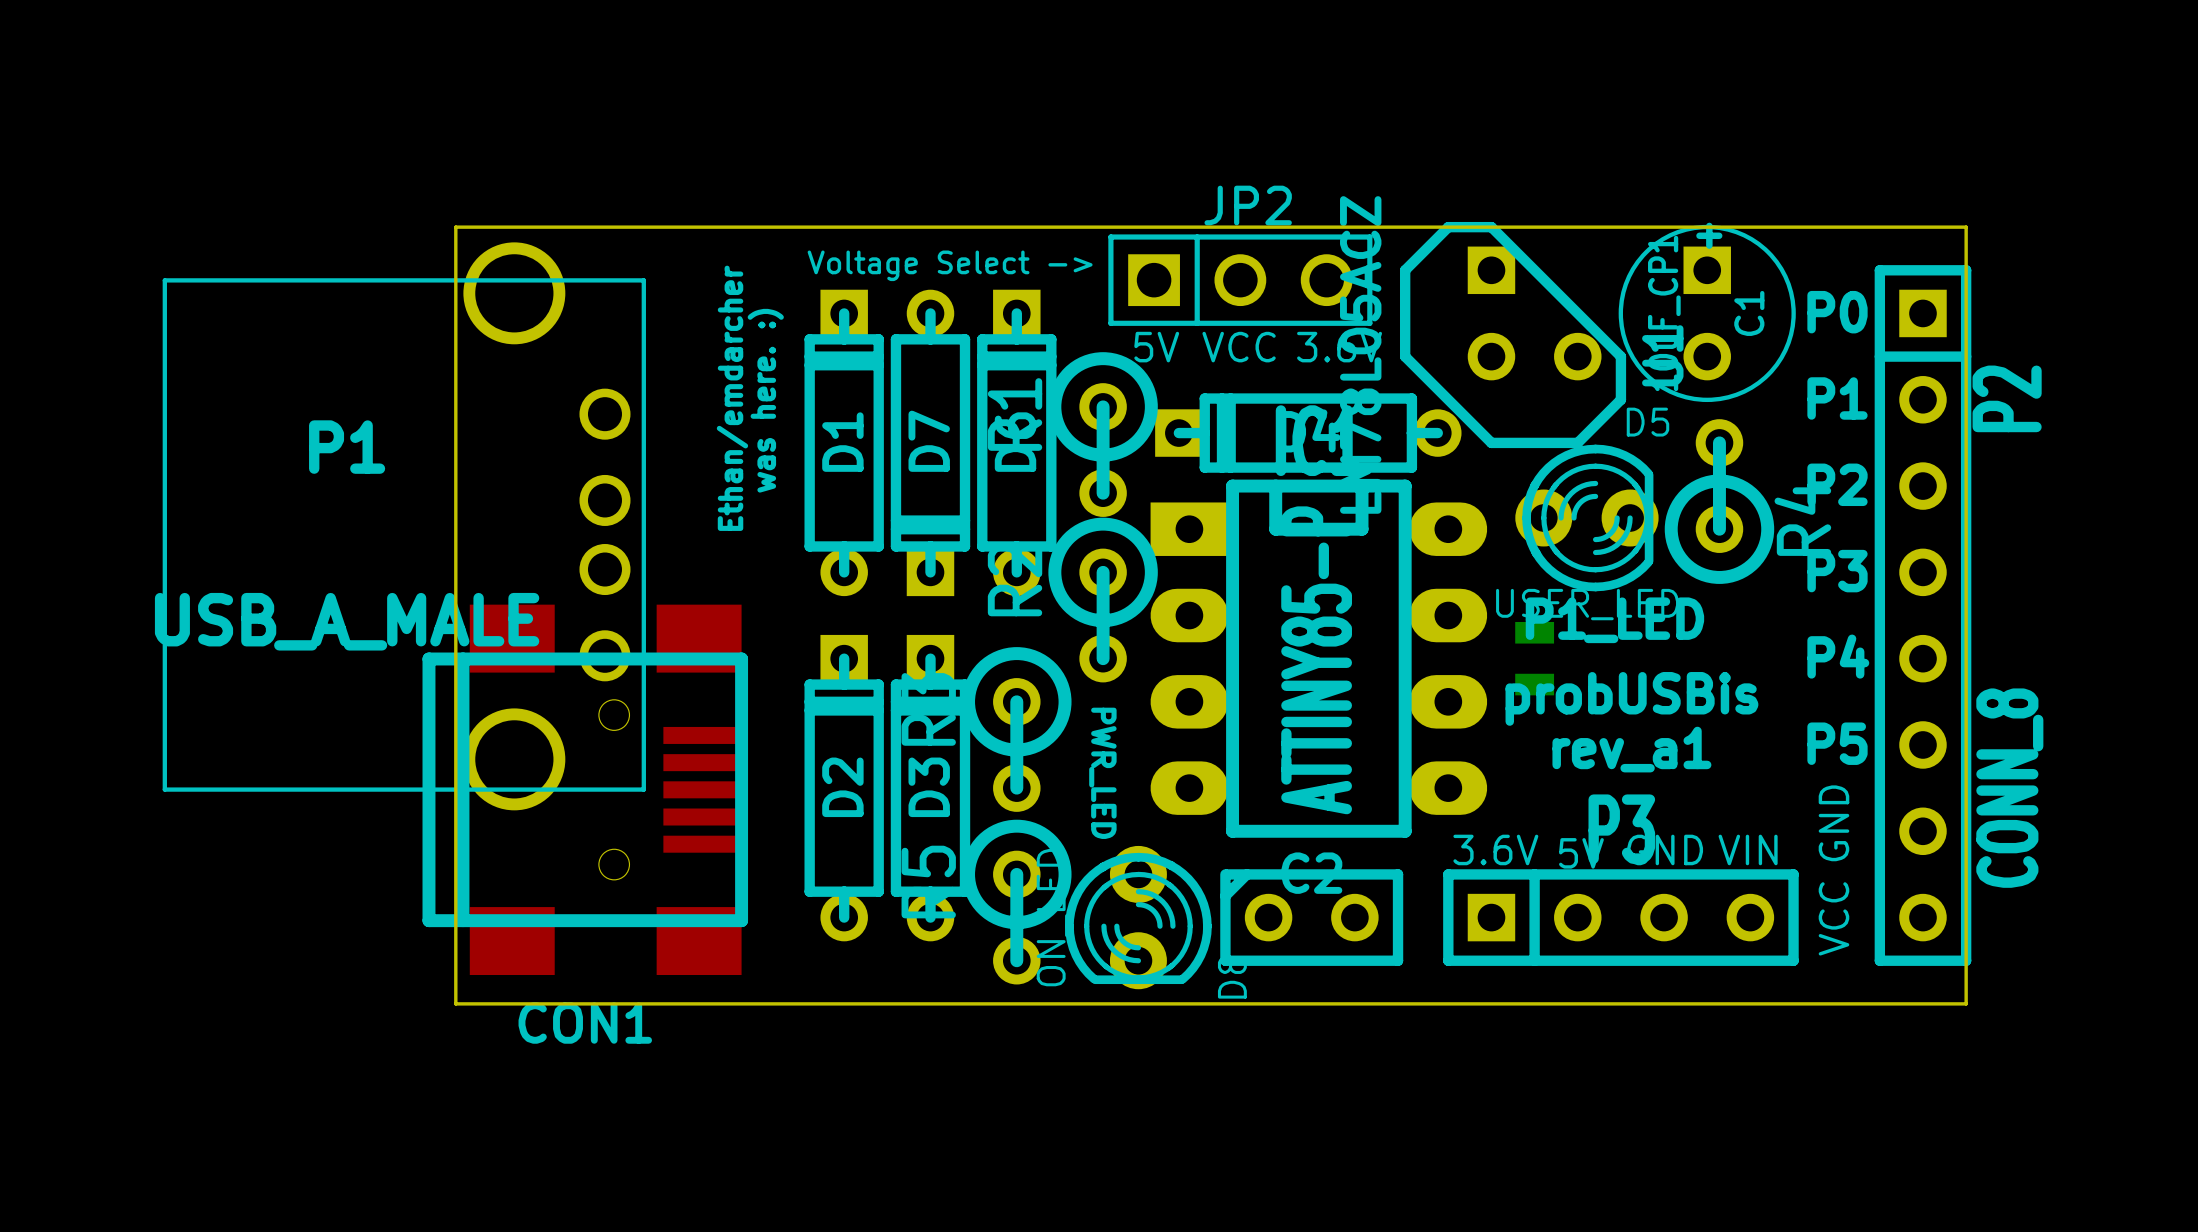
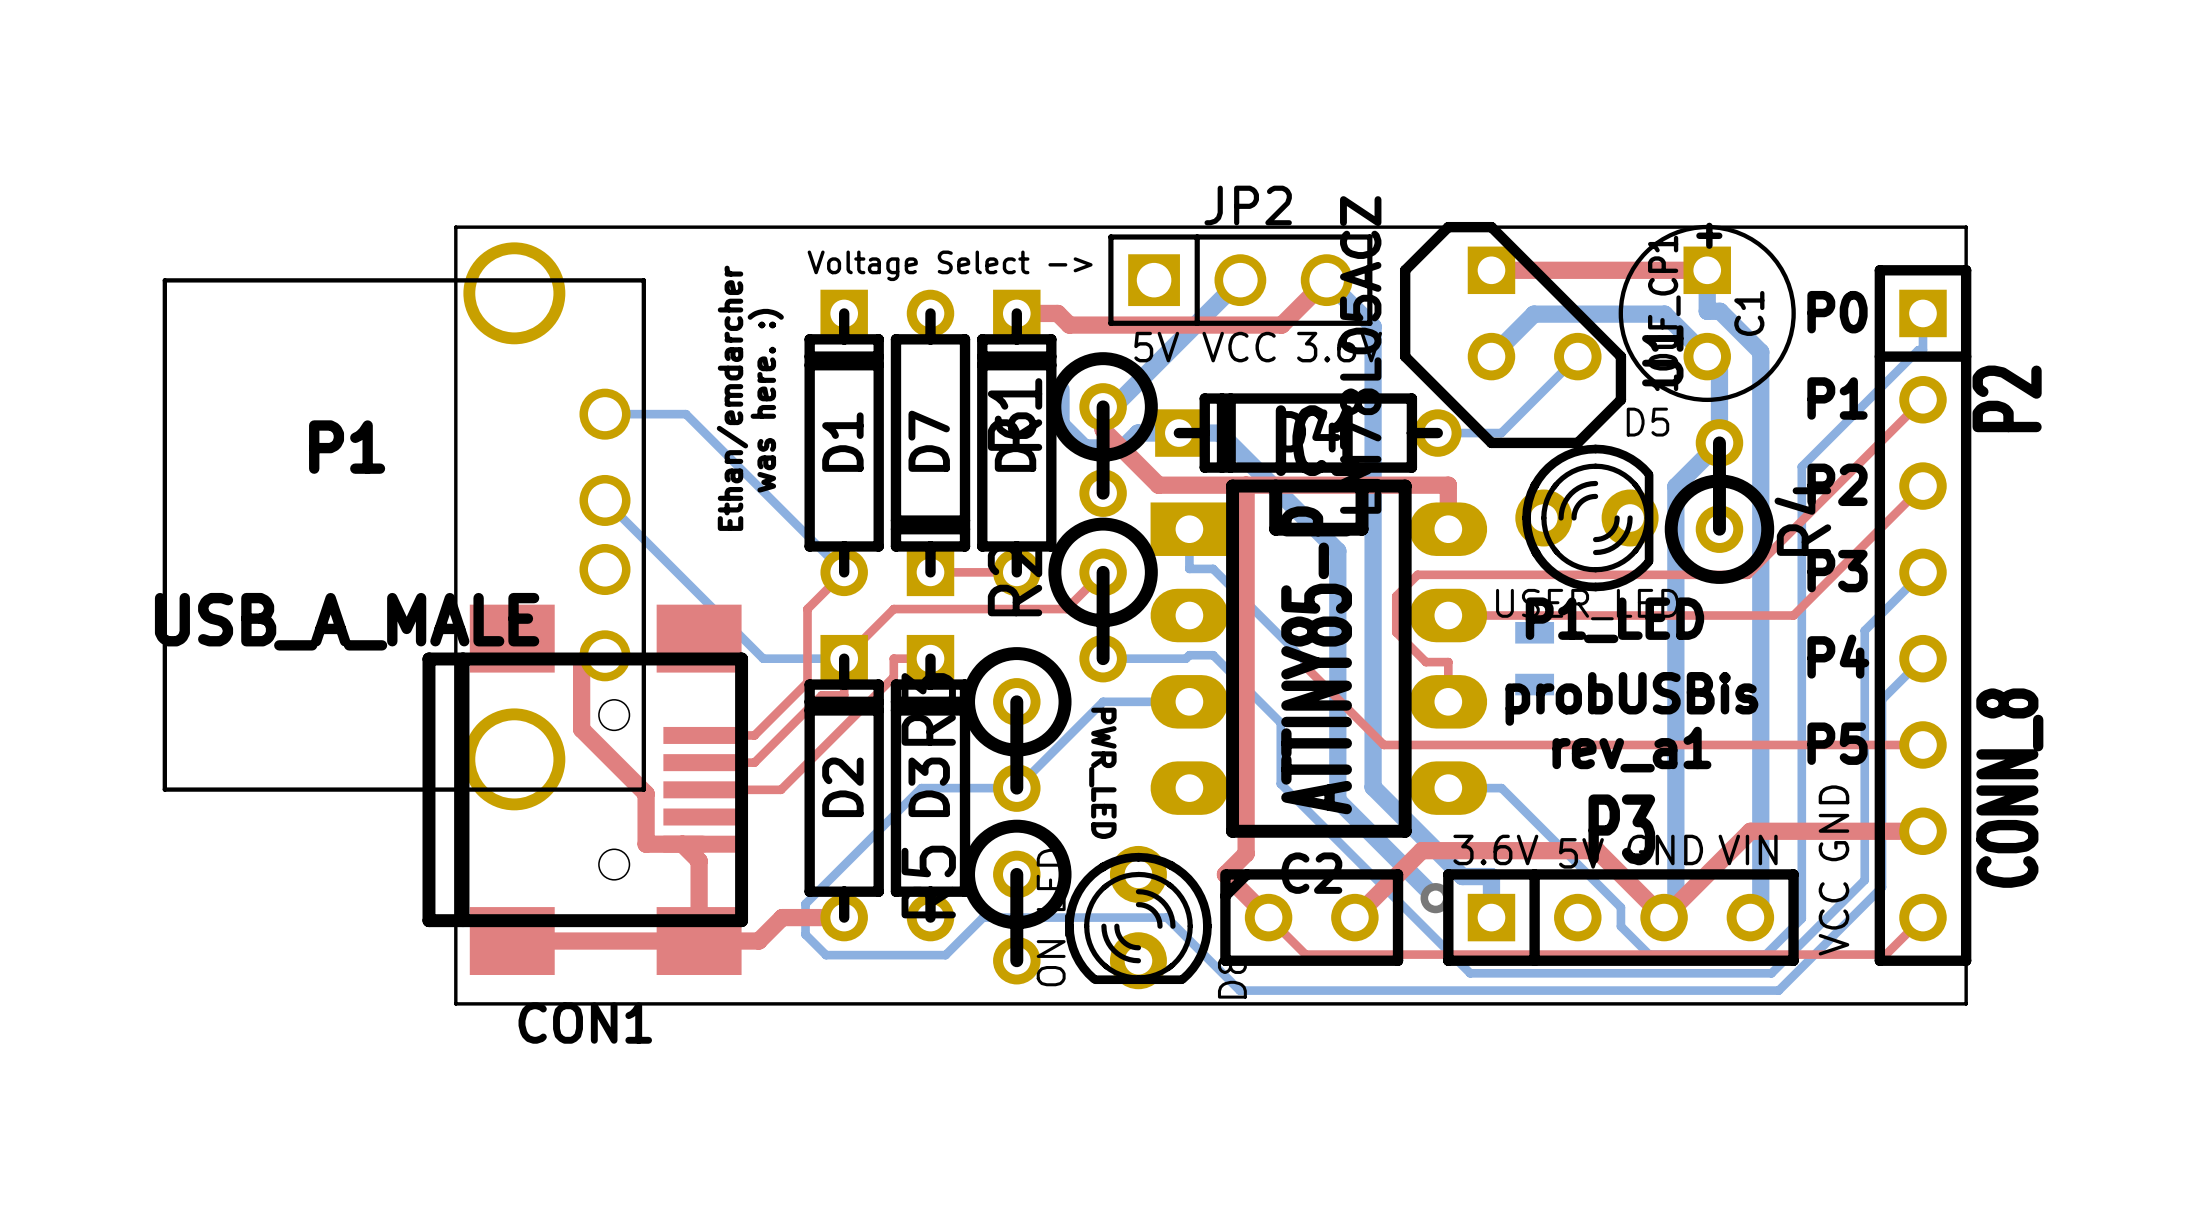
top track: none -> (1491, 270) (1707, 270)
bottom track: none -> (1707, 270) (1707, 311) (1720, 311) (1760, 352) (1760, 907) (1750, 917)
bottom track: none -> (1240, 280) (1113, 406) (1103, 406)
top track: none -> (1326, 280) (1281, 325) (1069, 325) (1057, 313) (1016, 313)
bottom track: none -> (1326, 280) (1373, 326) (1373, 787) (1462, 876) (1491, 876) (1491, 917)
bottom track: none -> (1922, 313) (1922, 350) (1918, 350) (1801, 466) (1801, 918) (1765, 954) (1649, 954) (1620, 926) (1620, 907) (1501, 788) (1448, 788)
bottom track: none -> (1491, 356) (1533, 314) (1664, 314) (1719, 368) (1719, 442) (1675, 486) (1675, 905) (1664, 917)
bottom track: none -> (1577, 356) (1501, 433) (1437, 433)
bottom track: none -> (1061, 389) (1061, 424) (1084, 447) (1123, 447) (1137, 433) (1219, 433) (1337, 550) (1337, 800) (1435, 898)
top track: none -> (1922, 399) (1747, 574) (1417, 574) (1396, 596) (1396, 632) (1425, 662) (1448, 662) (1448, 701)
top track: none -> (1103, 406) (1103, 429) (1158, 485) (1448, 485) (1448, 529)
bottom track: none -> (604, 414) (685, 414) (844, 572)
top track: none -> (1246, 485) (1246, 853) (1225, 874) (1305, 954) (1886, 954) (1922, 917)
top track: none -> (1922, 486) (1793, 615) (1448, 615)
bottom track: none -> (604, 500) (763, 658) (844, 658)
bottom track: none -> (1189, 529) (1189, 568) (1213, 568) (1304, 660) (1304, 665)
top track: none -> (844, 572) (807, 609) (807, 682) (754, 735) (702, 735)
top track: none -> (930, 572) (1016, 572)
top track: none -> (1103, 572) (1066, 609) (893, 609) (844, 658) (844, 695) (821, 695) (754, 762) (702, 762)
bottom track: none -> (1922, 572) (1864, 630) (1864, 880) (1771, 973) (1470, 973) (1280, 783) (1280, 722) (1213, 655) (1189, 655) (1185, 658) (1103, 658)
top track: none -> (588, 655) (581, 663) (581, 729) (646, 793) (646, 844) (702, 844)
top track: none -> (930, 658) (893, 658) (893, 677) (780, 789) (702, 789)
bottom track: none -> (1922, 658) (1882, 699) (1882, 887) (1778, 990) (1239, 990) (1166, 917) (983, 917) (945, 955) (826, 955) (805, 934) (805, 903) (921, 788) (1016, 788) (1103, 701) (1189, 701)
top track: none -> (1304, 665) (1383, 744) (1922, 744)
top track: none -> (1922, 831) (1750, 831) (1664, 917) (1597, 850) (1421, 850) (1354, 917)
top track: none -> (682, 844) (699, 860) (699, 941)
via: none -> (1435, 898)
top track: none -> (844, 917) (782, 917) (758, 941) (512, 941)

